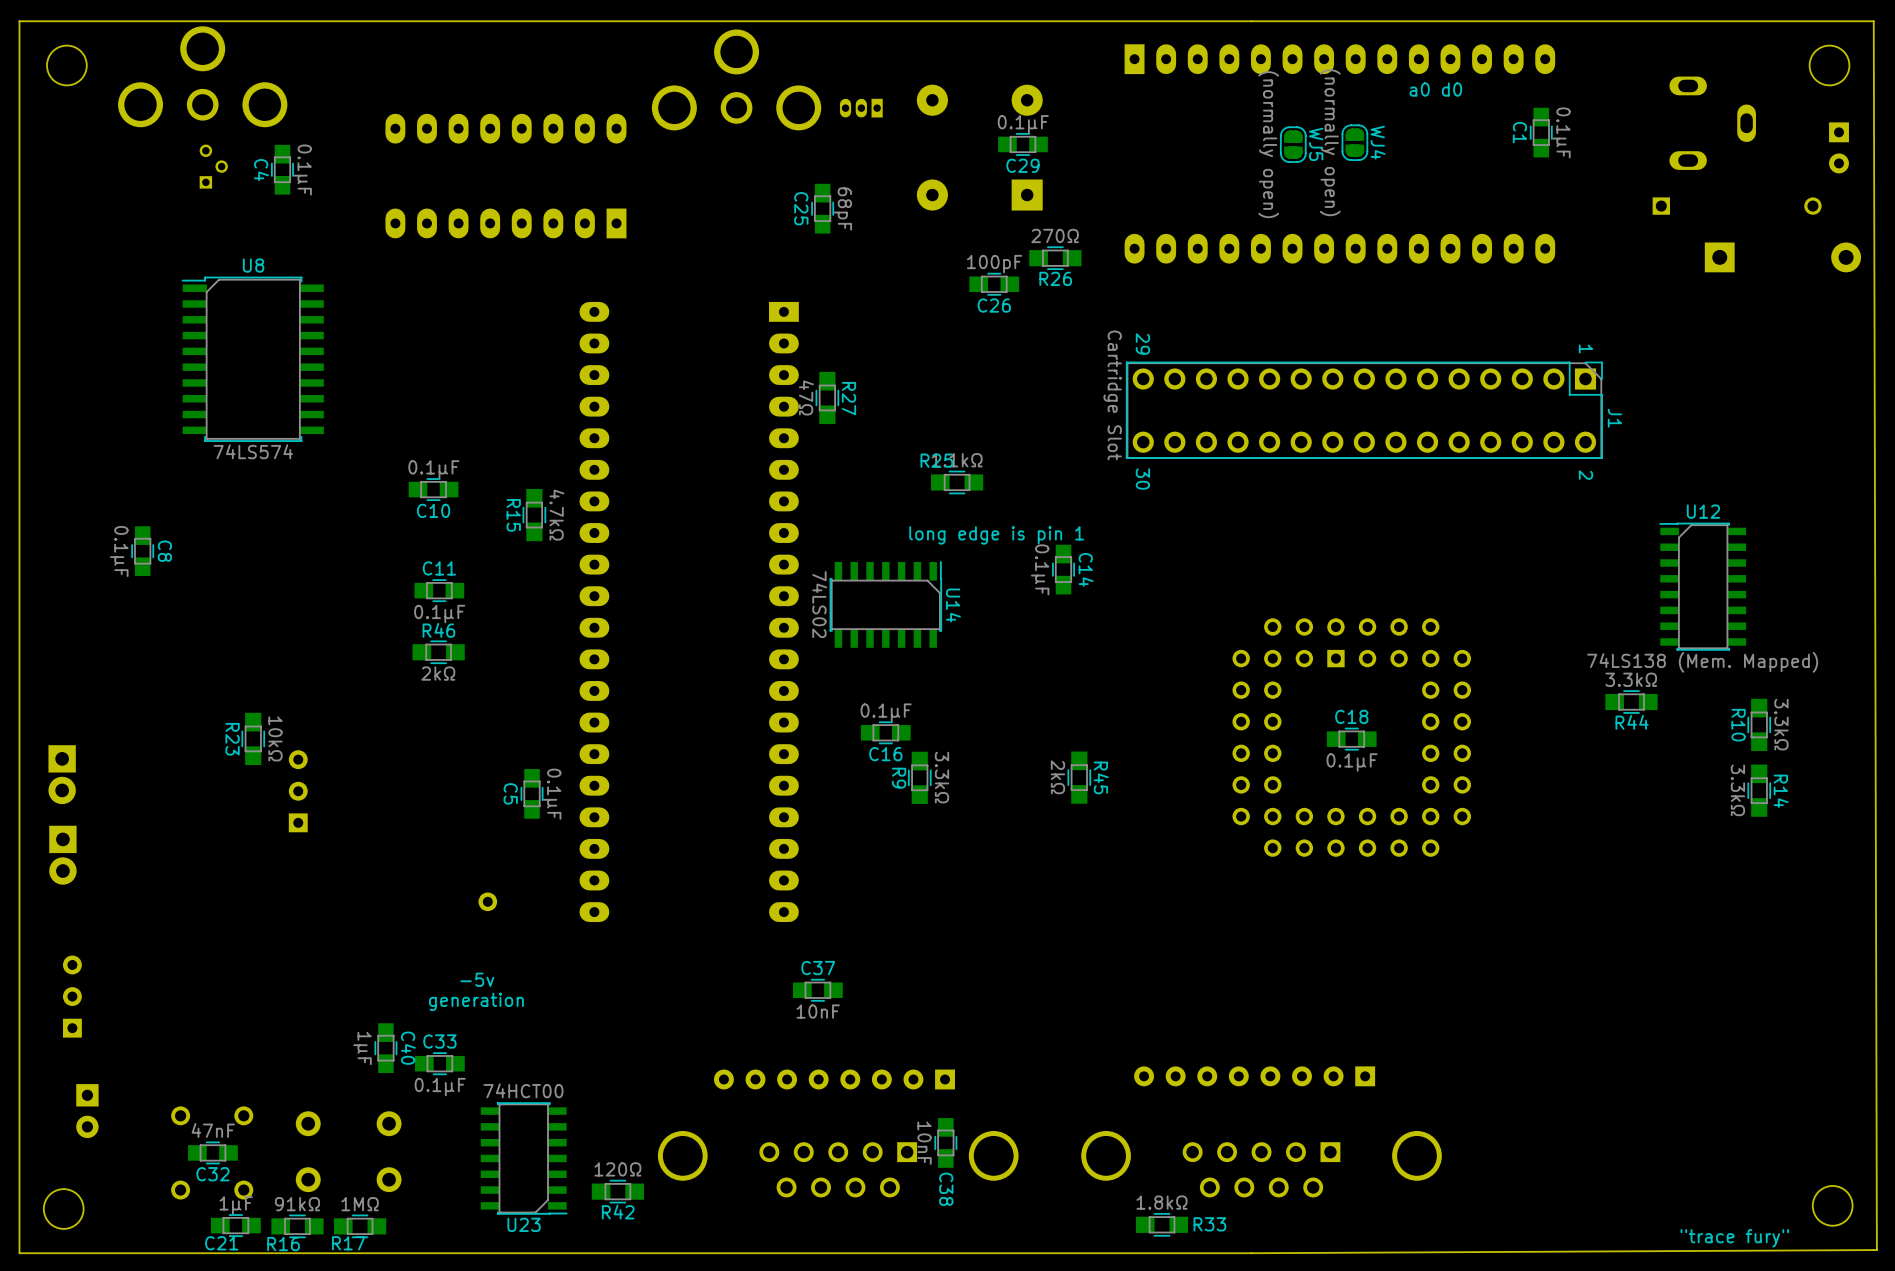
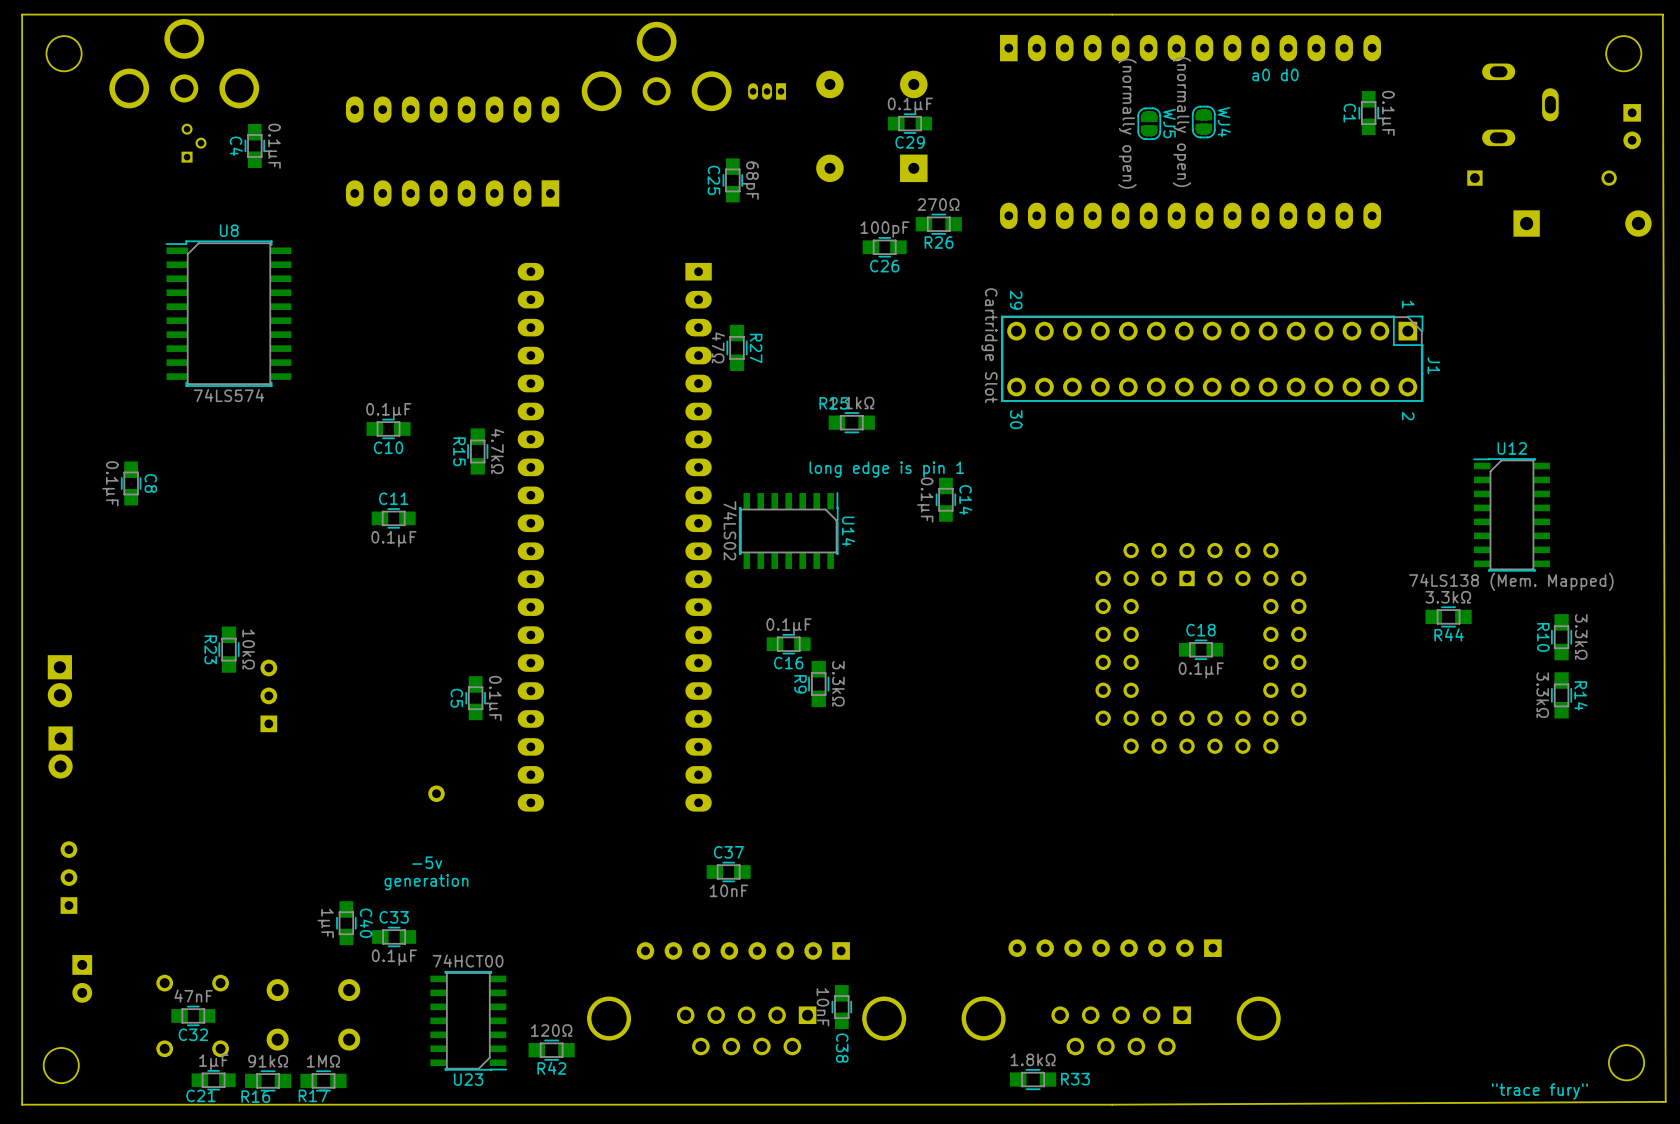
R46: 2kΩ (438, 652) -> none
R45: 2kΩ (1079, 777) -> none

